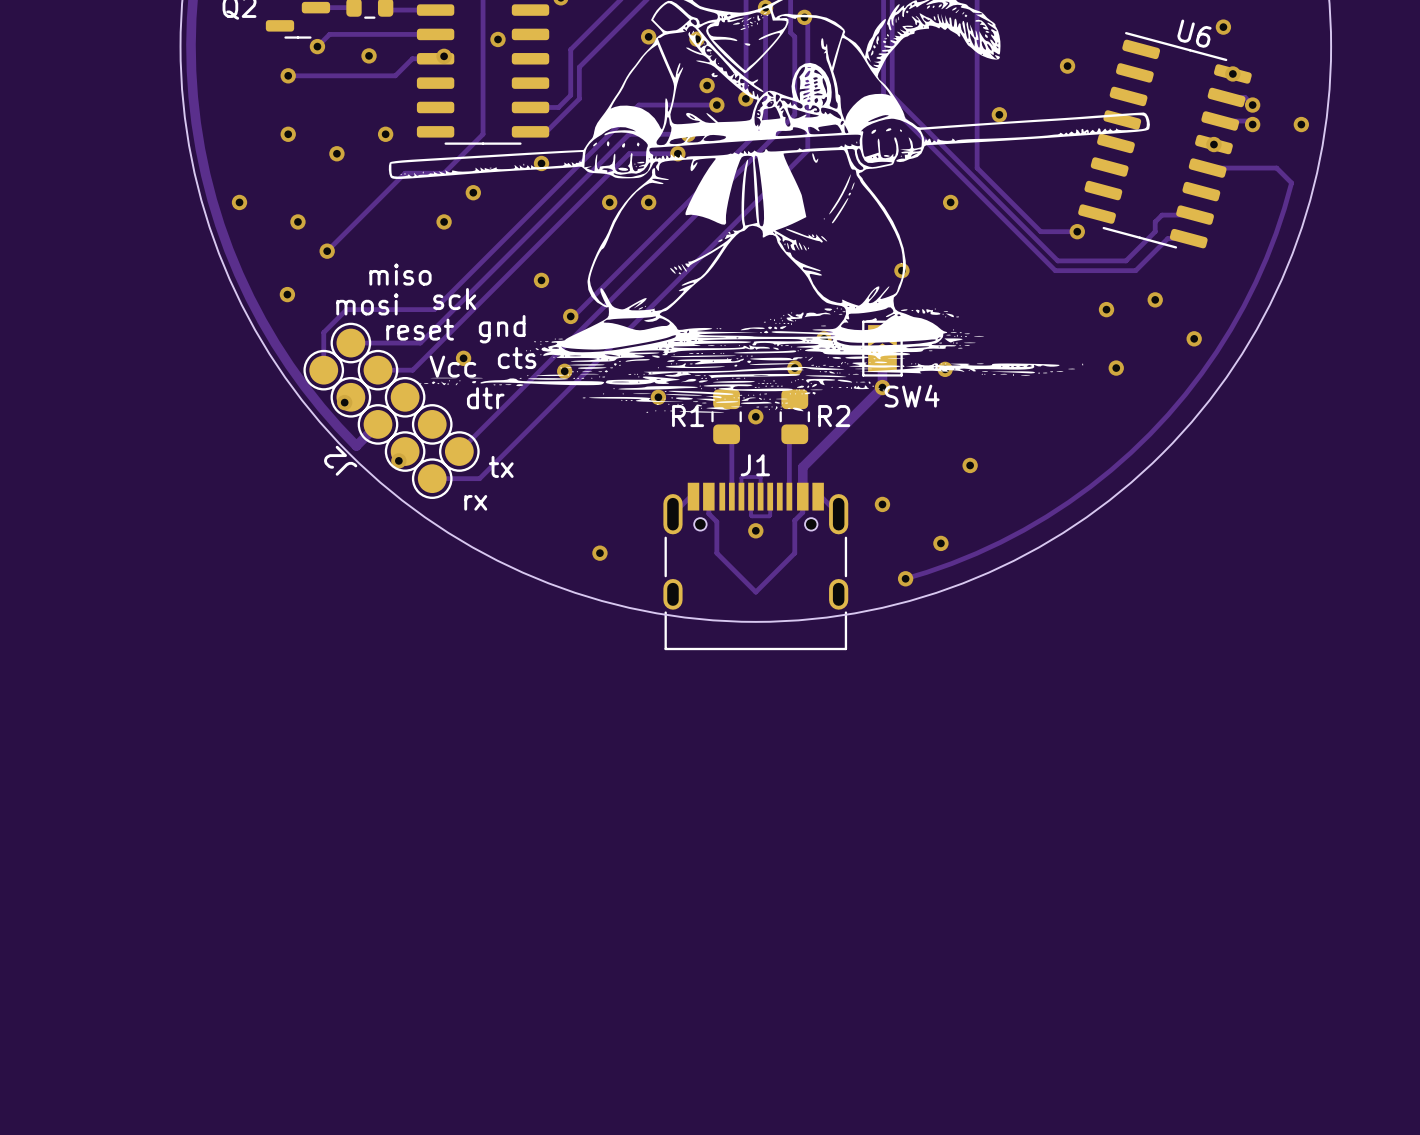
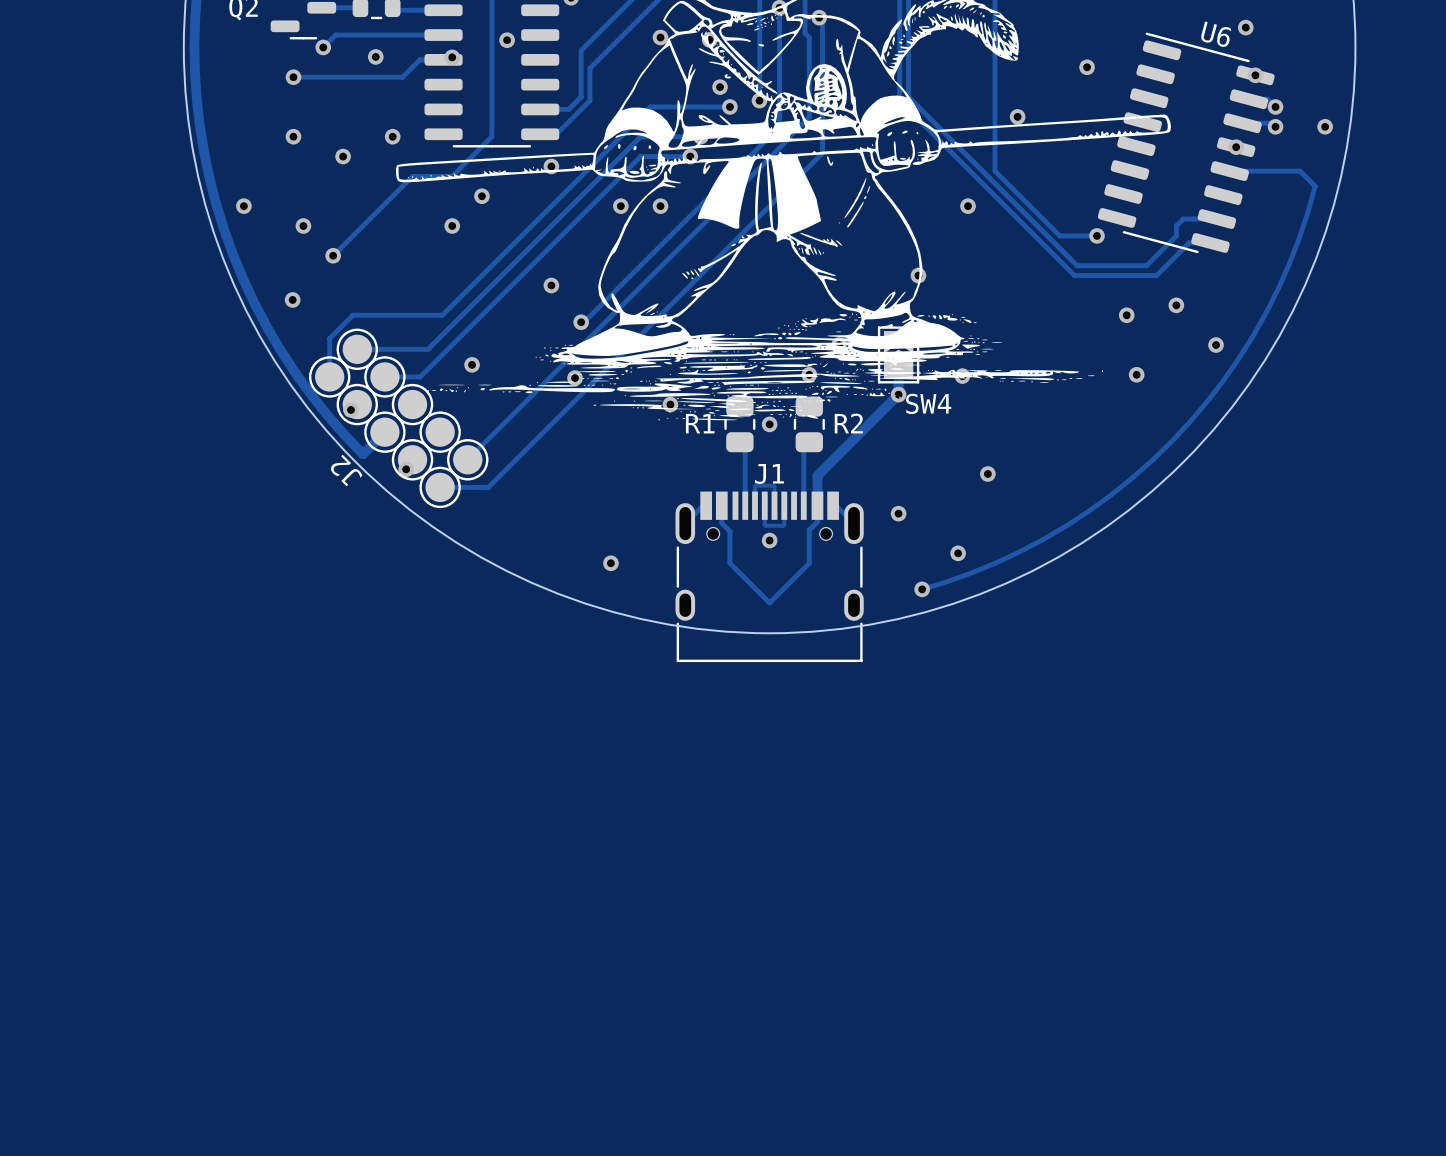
text: miso (400, 274) -> none
text: sck (454, 299) -> none
text: mosi (367, 304) -> none
text: reset (420, 329) -> none
text: gnd (502, 329) -> none
text: cts (517, 358) -> none
text: Vcc (452, 366) -> none
text: dtr (485, 398) -> none
text: tx (501, 466) -> none
text: rx (475, 502) -> none

